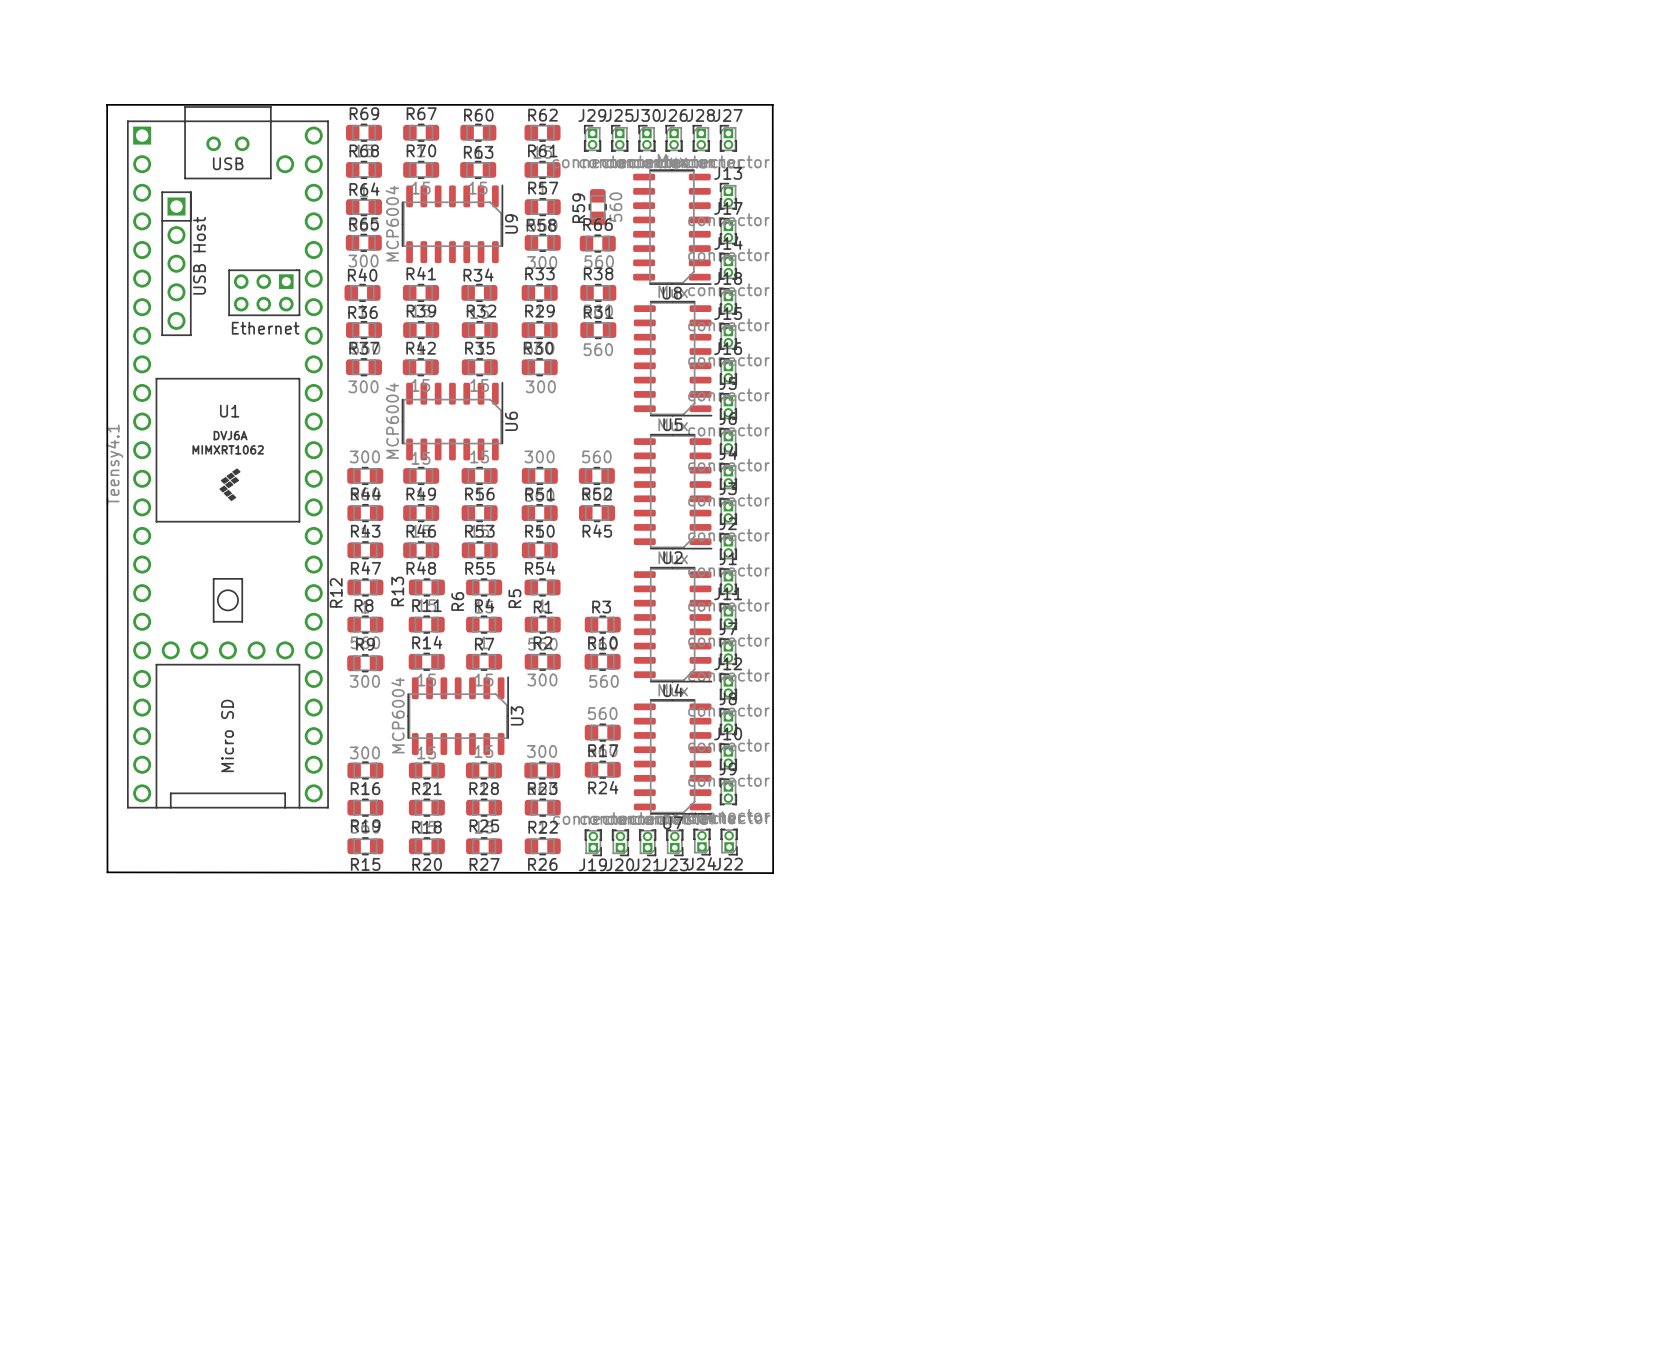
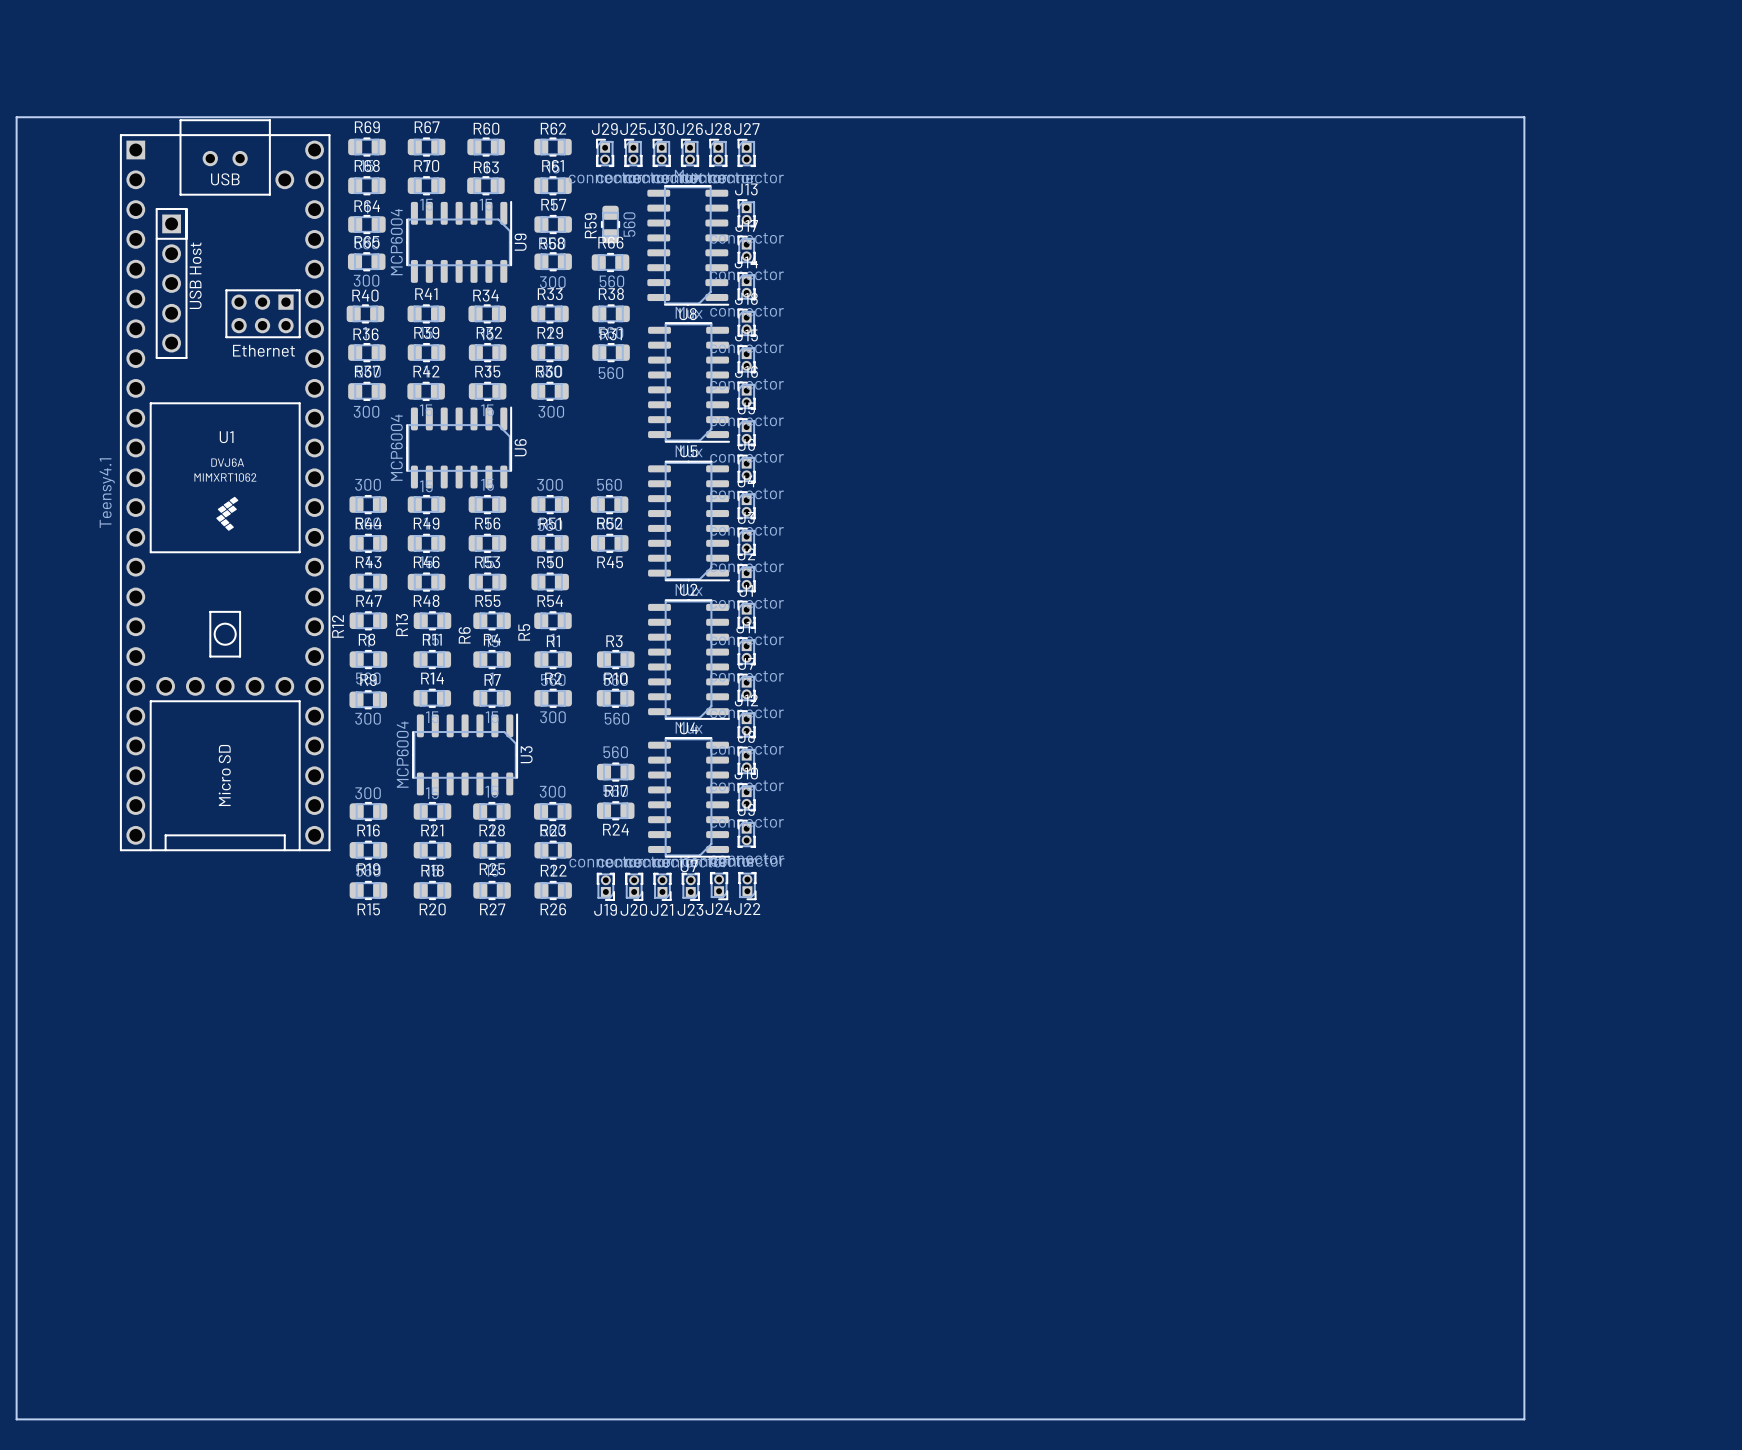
board edge: none -> (16, 117) (16, 1419) (1524, 1419) (1524, 117) (16, 117)
board edge: (107, 104) (107, 872) (773, 873) (772, 104) (107, 104) -> none

